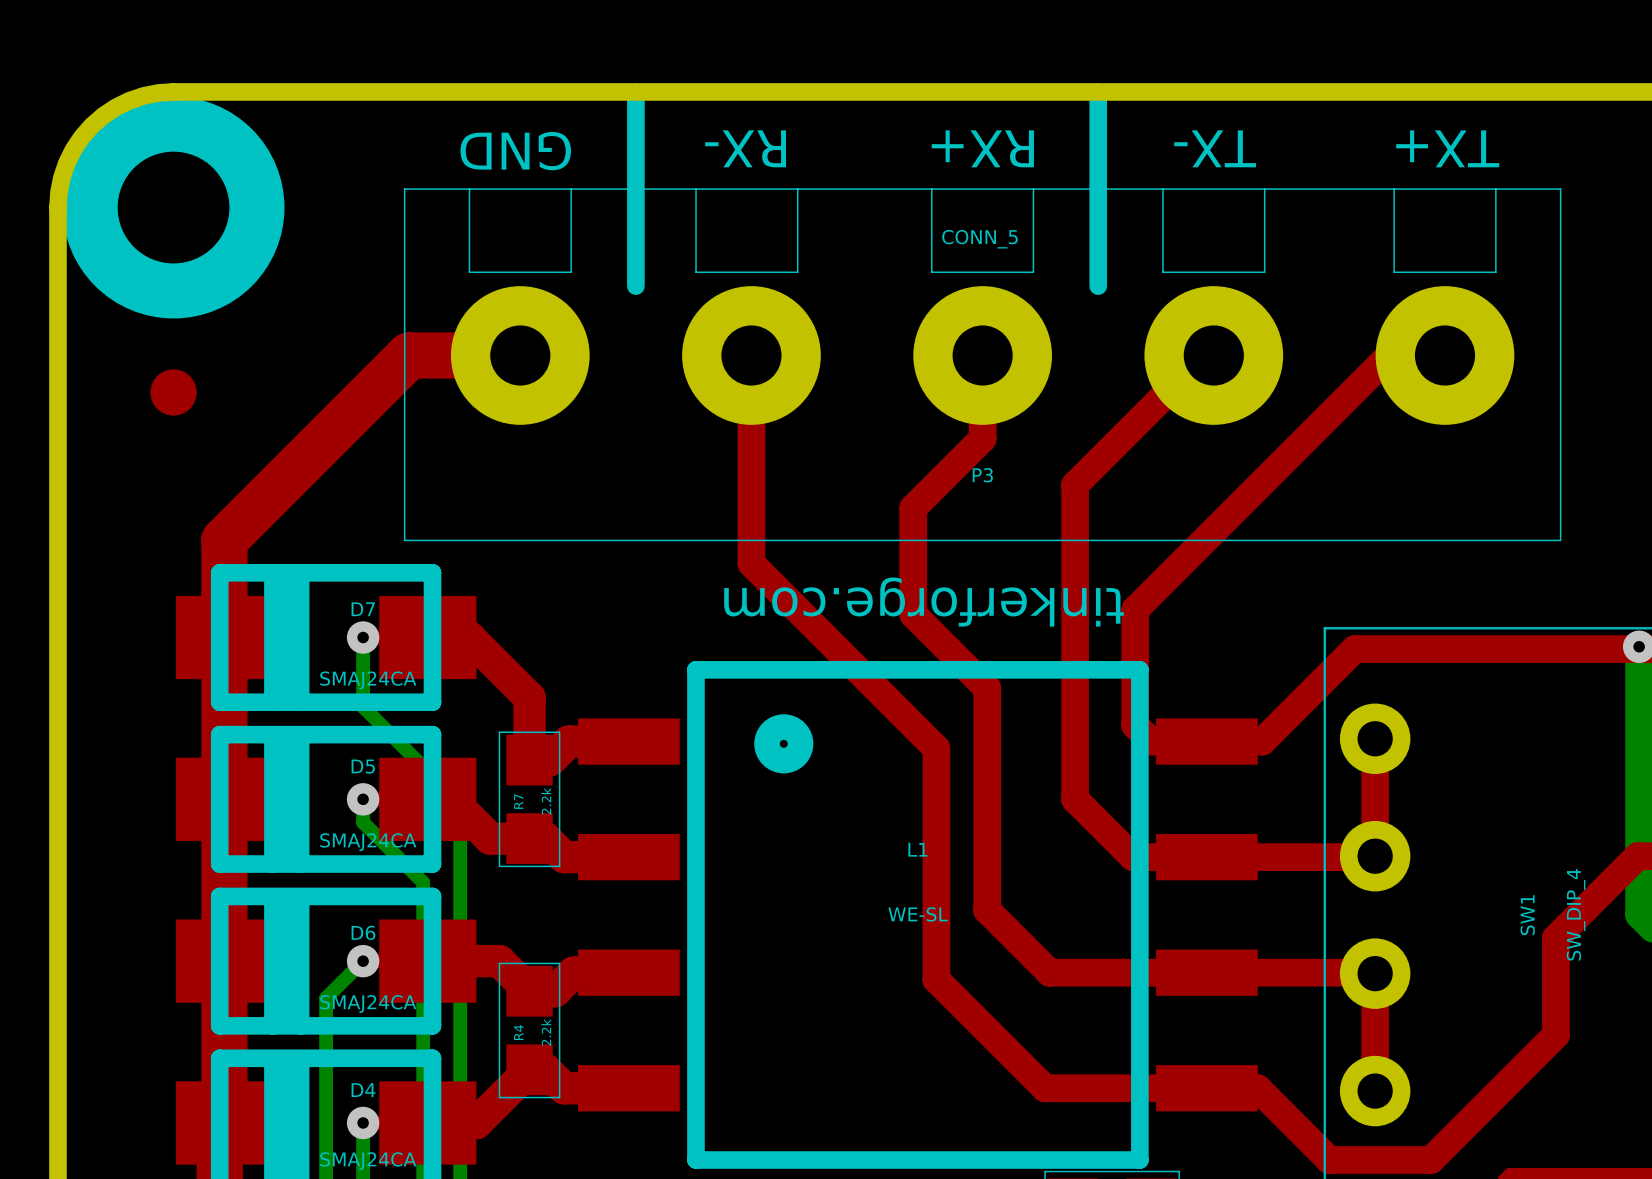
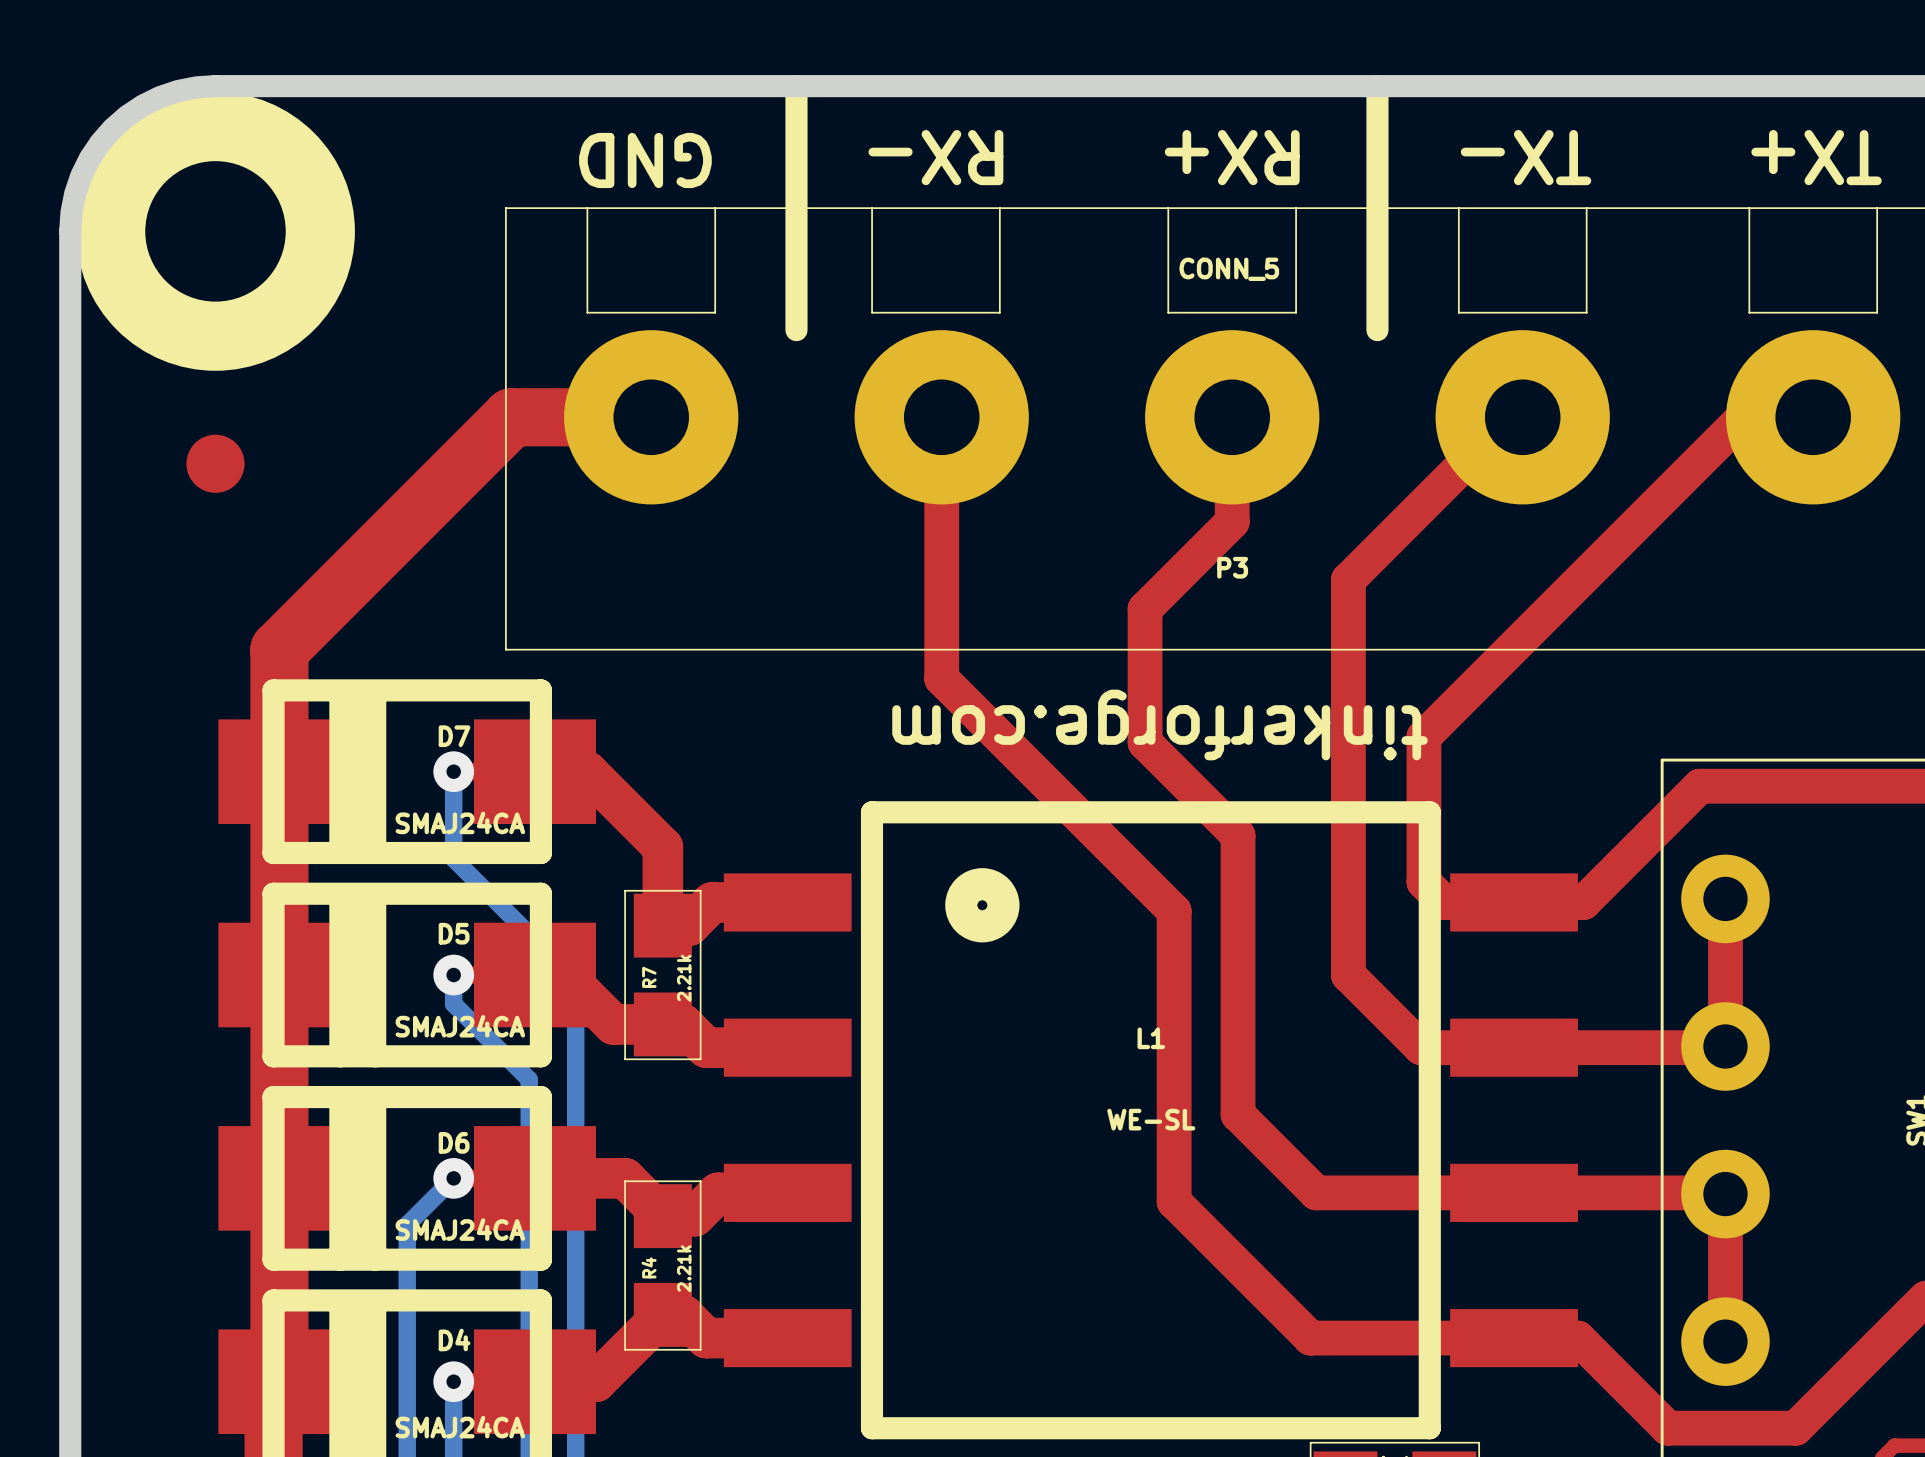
R7 value: 2.2k (546, 801) -> 2.21k (684, 978)
R4 value: 2.2k (546, 1032) -> 2.21k (684, 1268)

